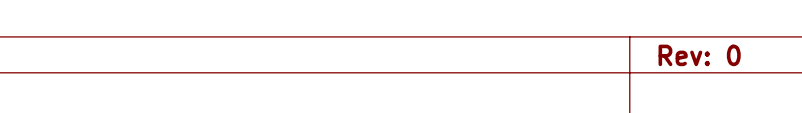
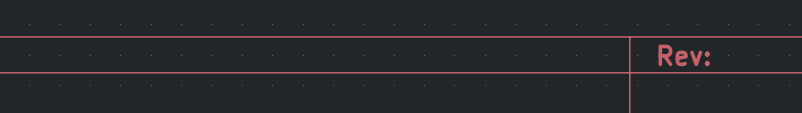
title block: Rev: 0 (699, 55) -> Rev: (684, 55)

